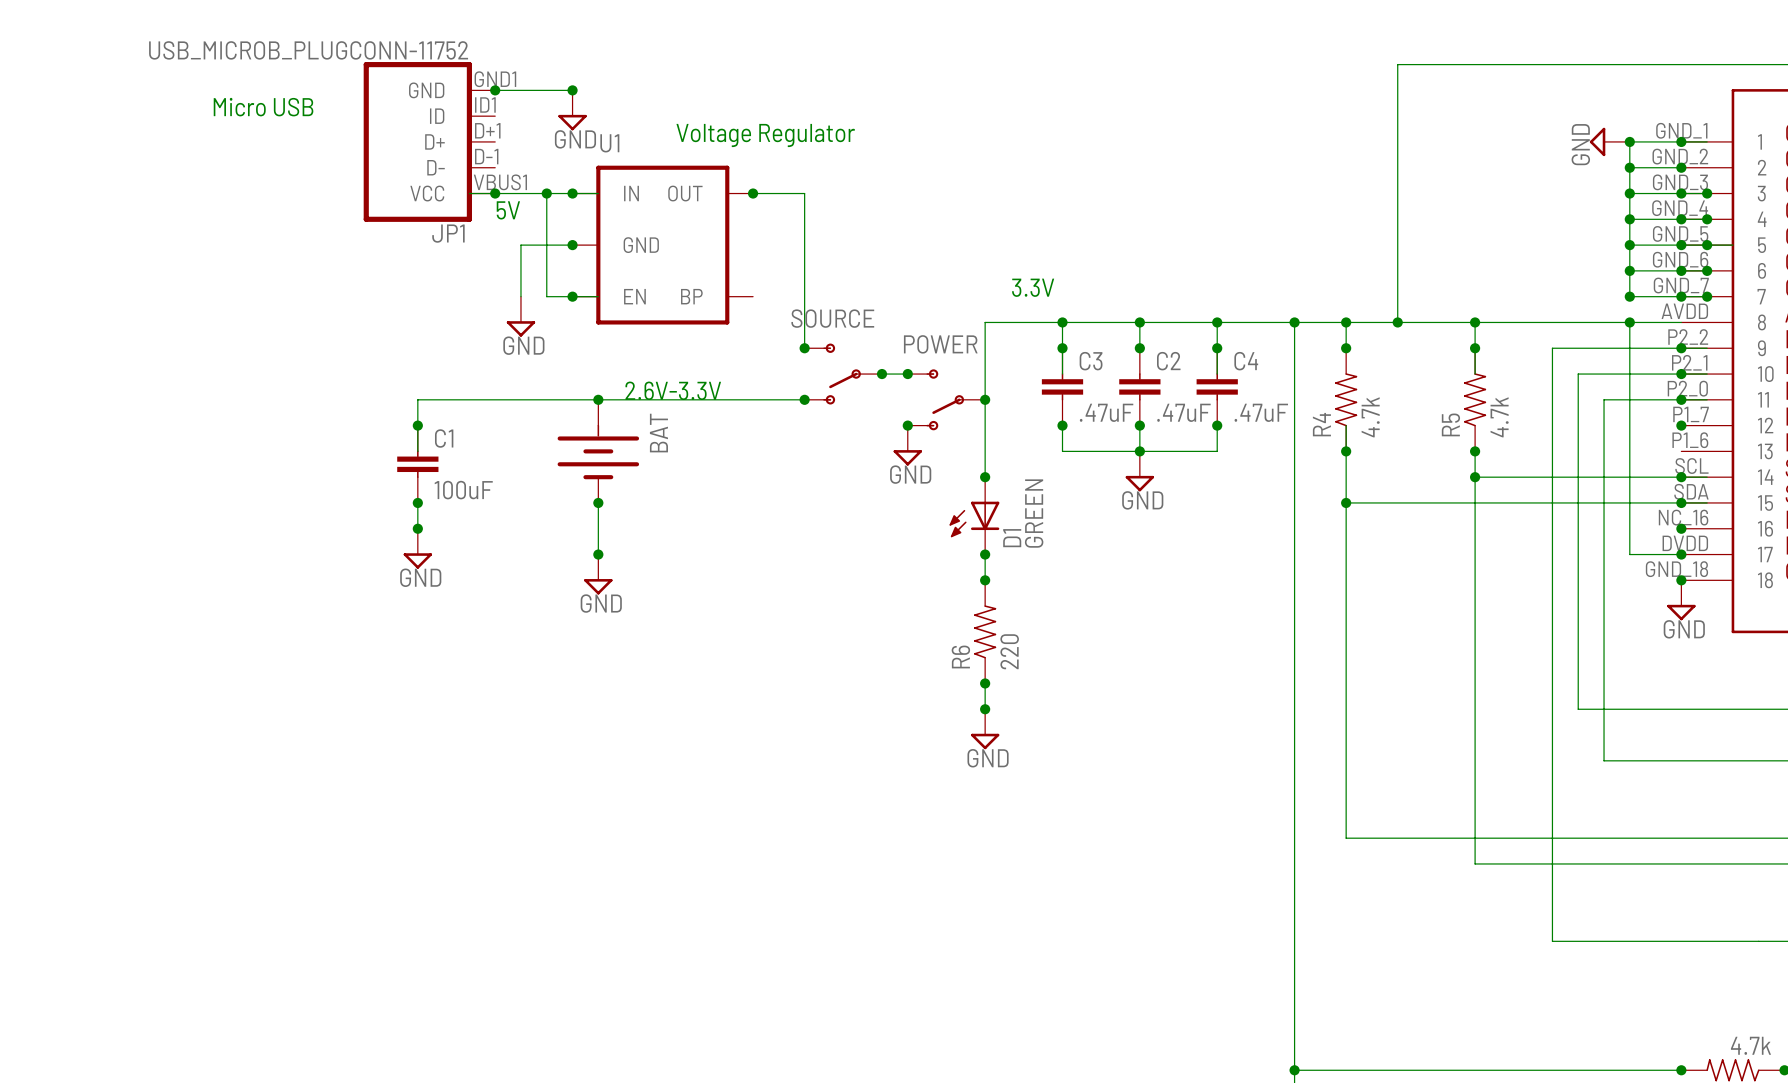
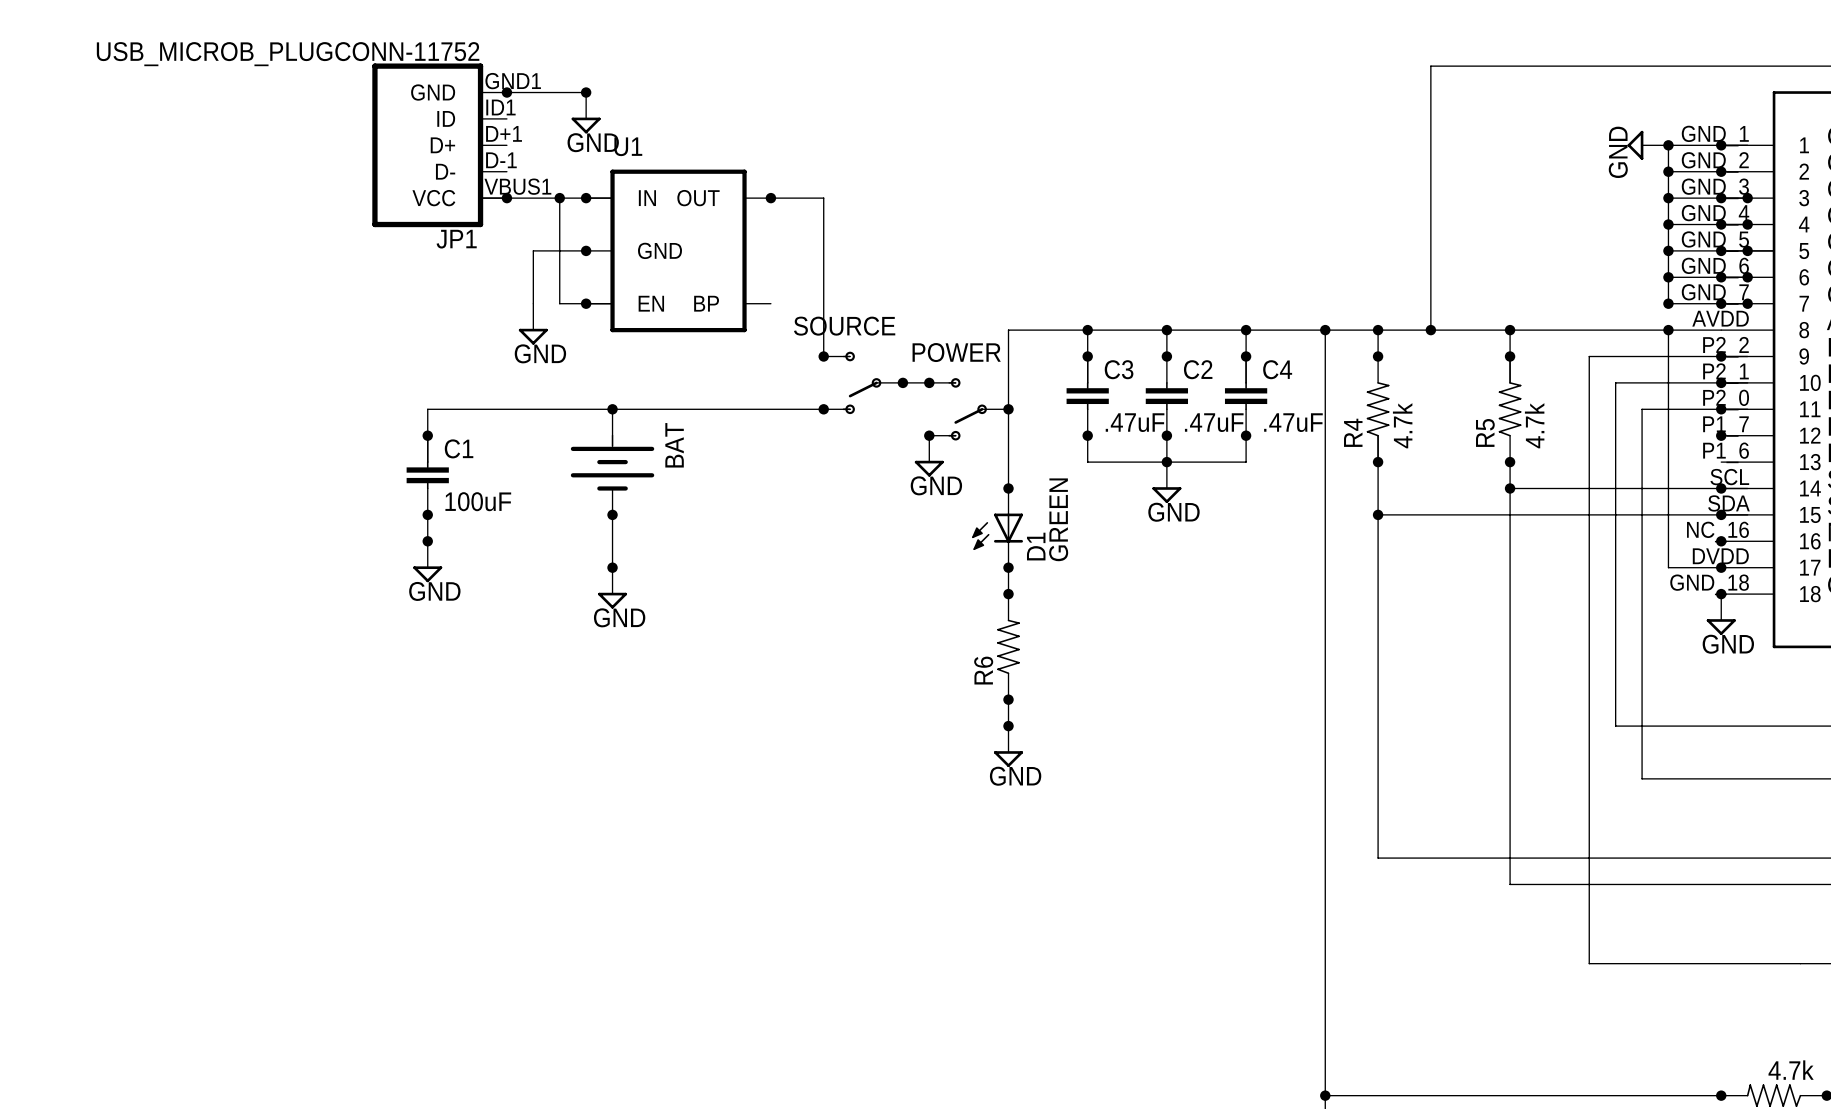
text: Micro USB (263, 107) -> none
text: Voltage Regulator (765, 135) -> none
text: 5V (508, 210) -> none
text: 3.3V (1033, 287) -> none
text: 2.6V-3.3V (673, 390) -> none
R6 value: 220 (1009, 651) -> none

